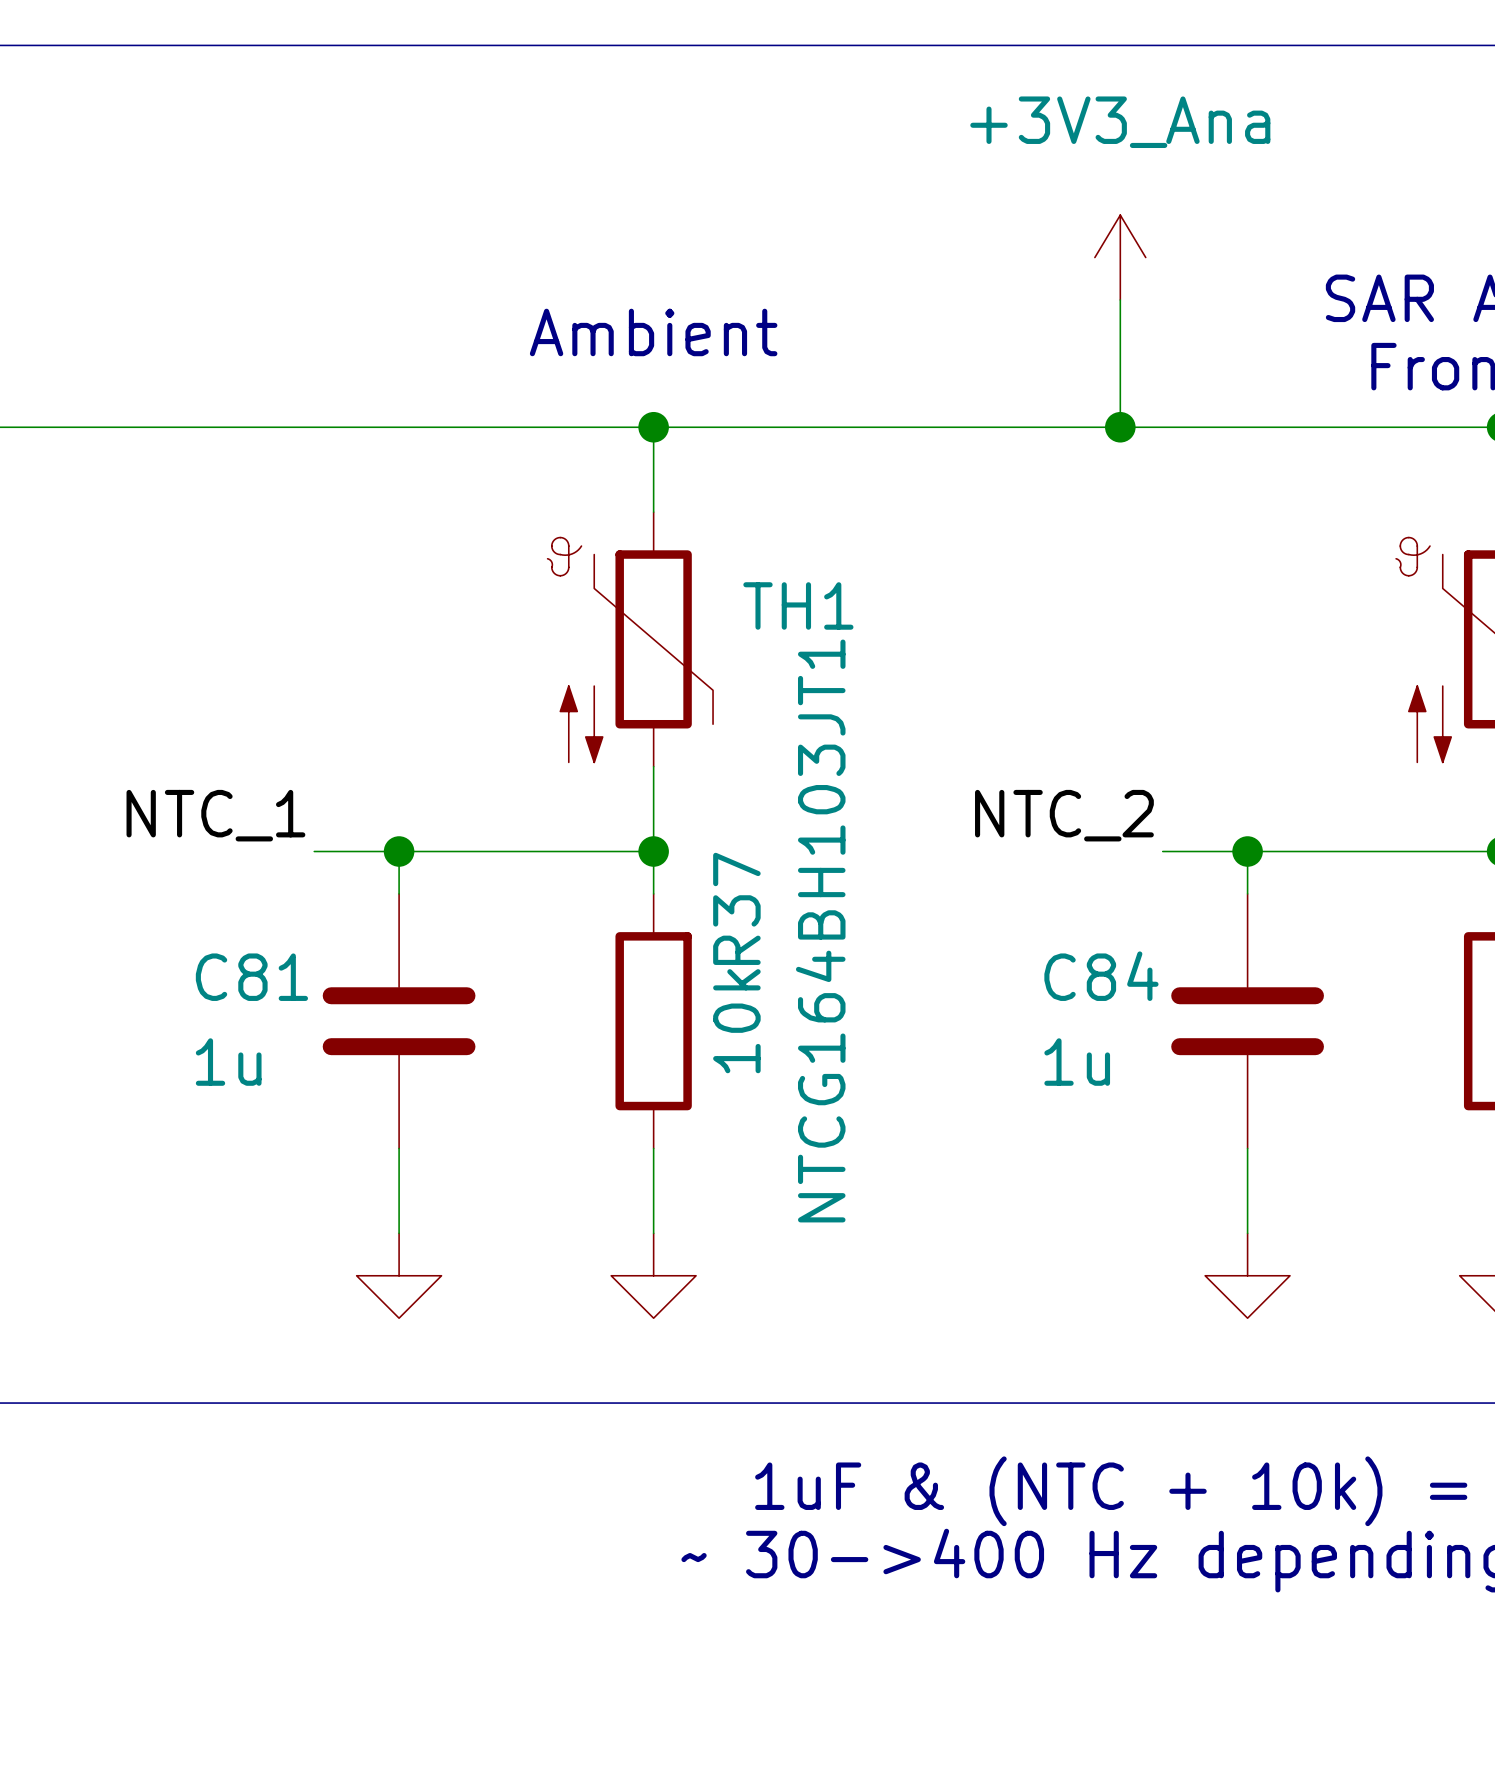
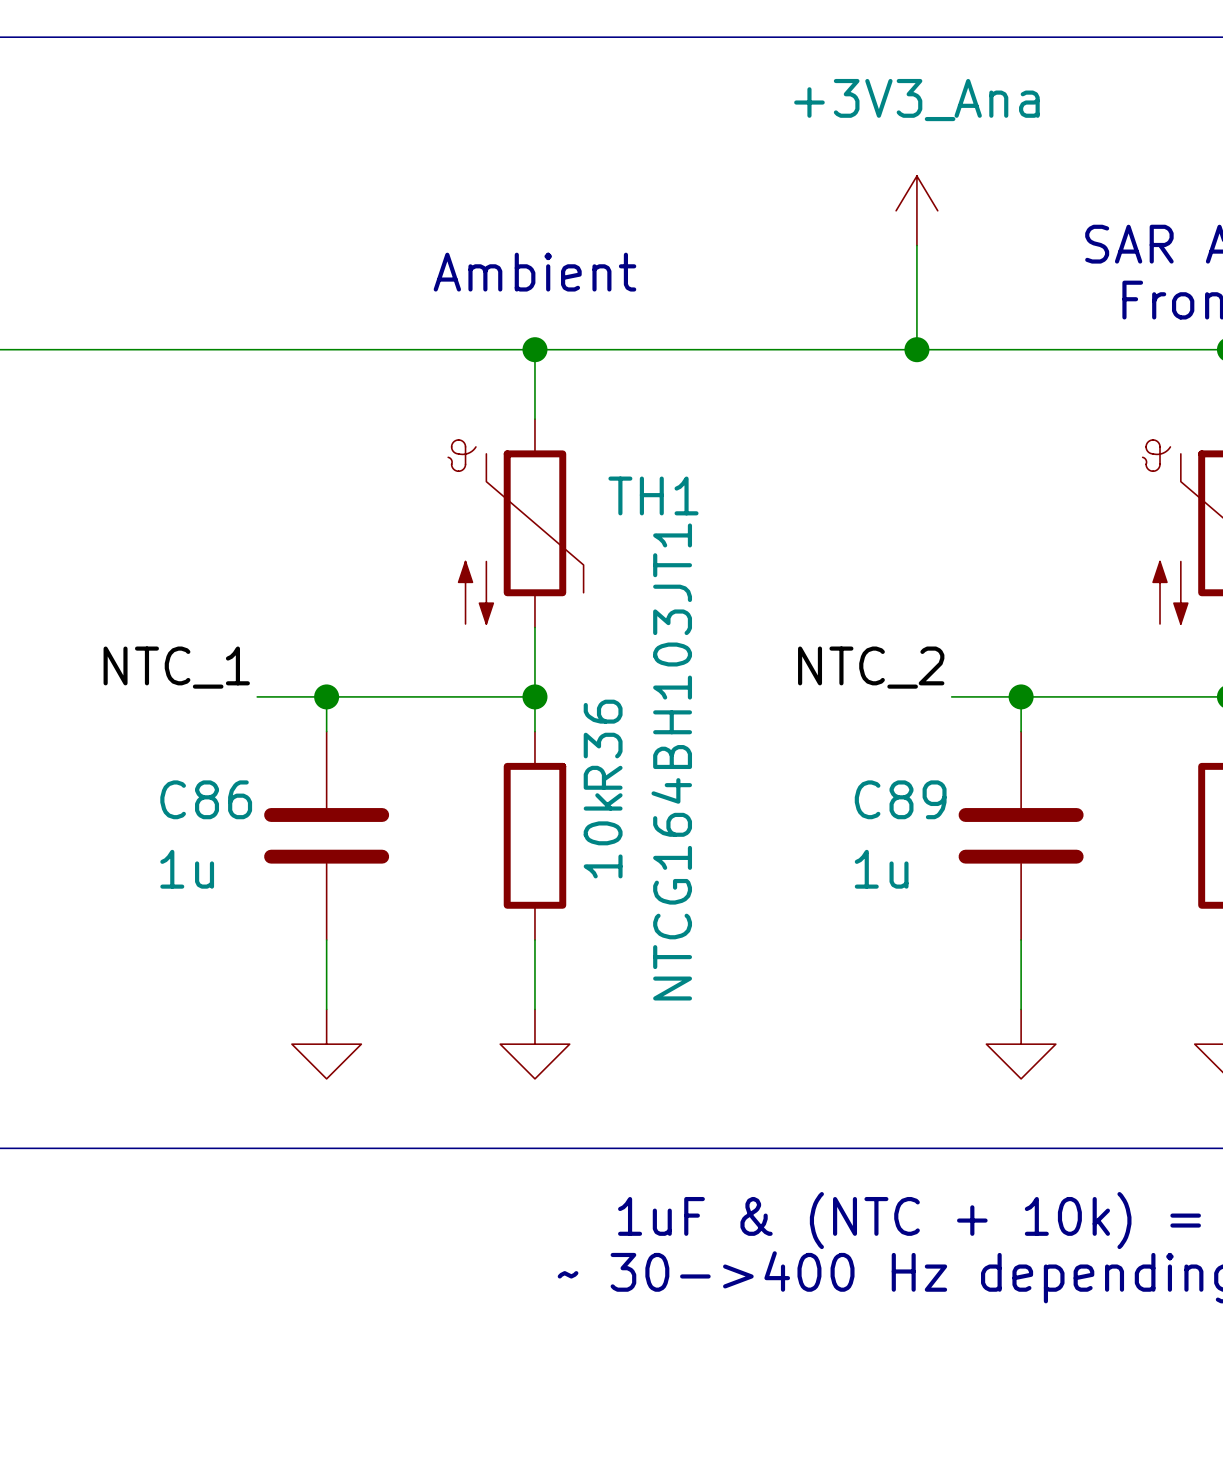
R37 name: R37 (736, 908) -> R36 (603, 744)
C84 name: C84 (1101, 976) -> C89 (900, 799)
C81 name: C81 (251, 977) -> C86 (206, 799)

